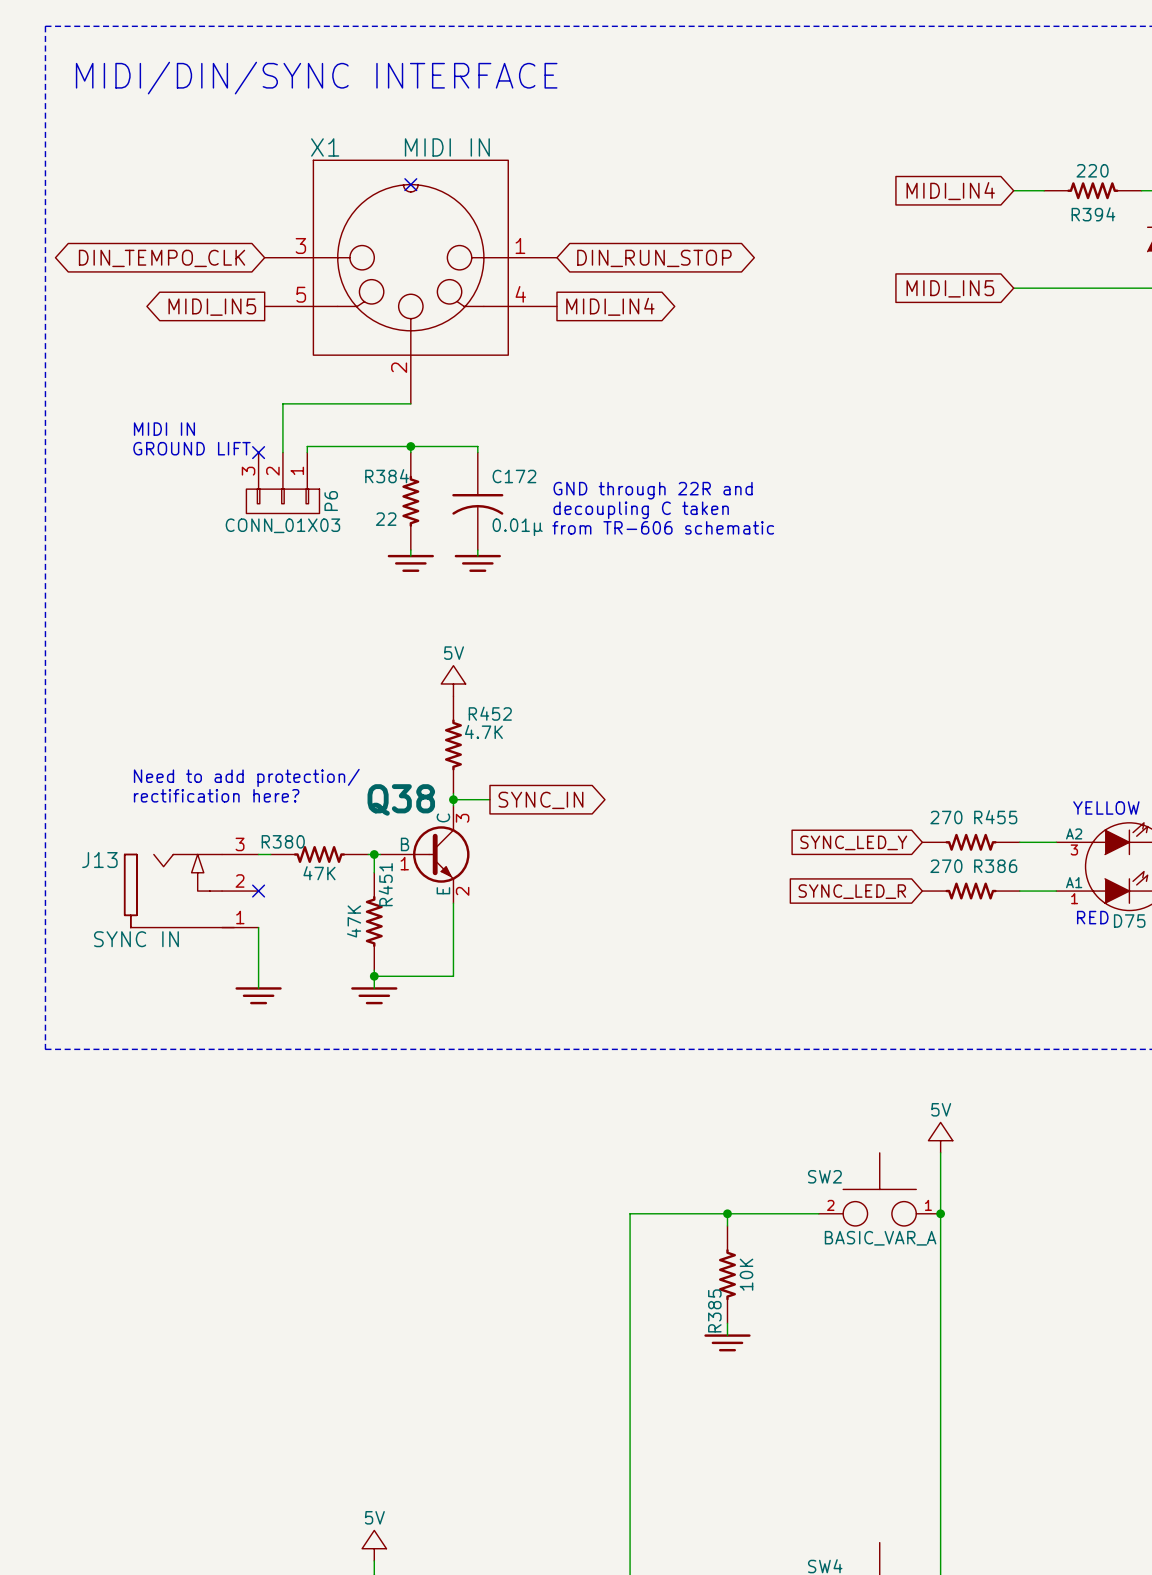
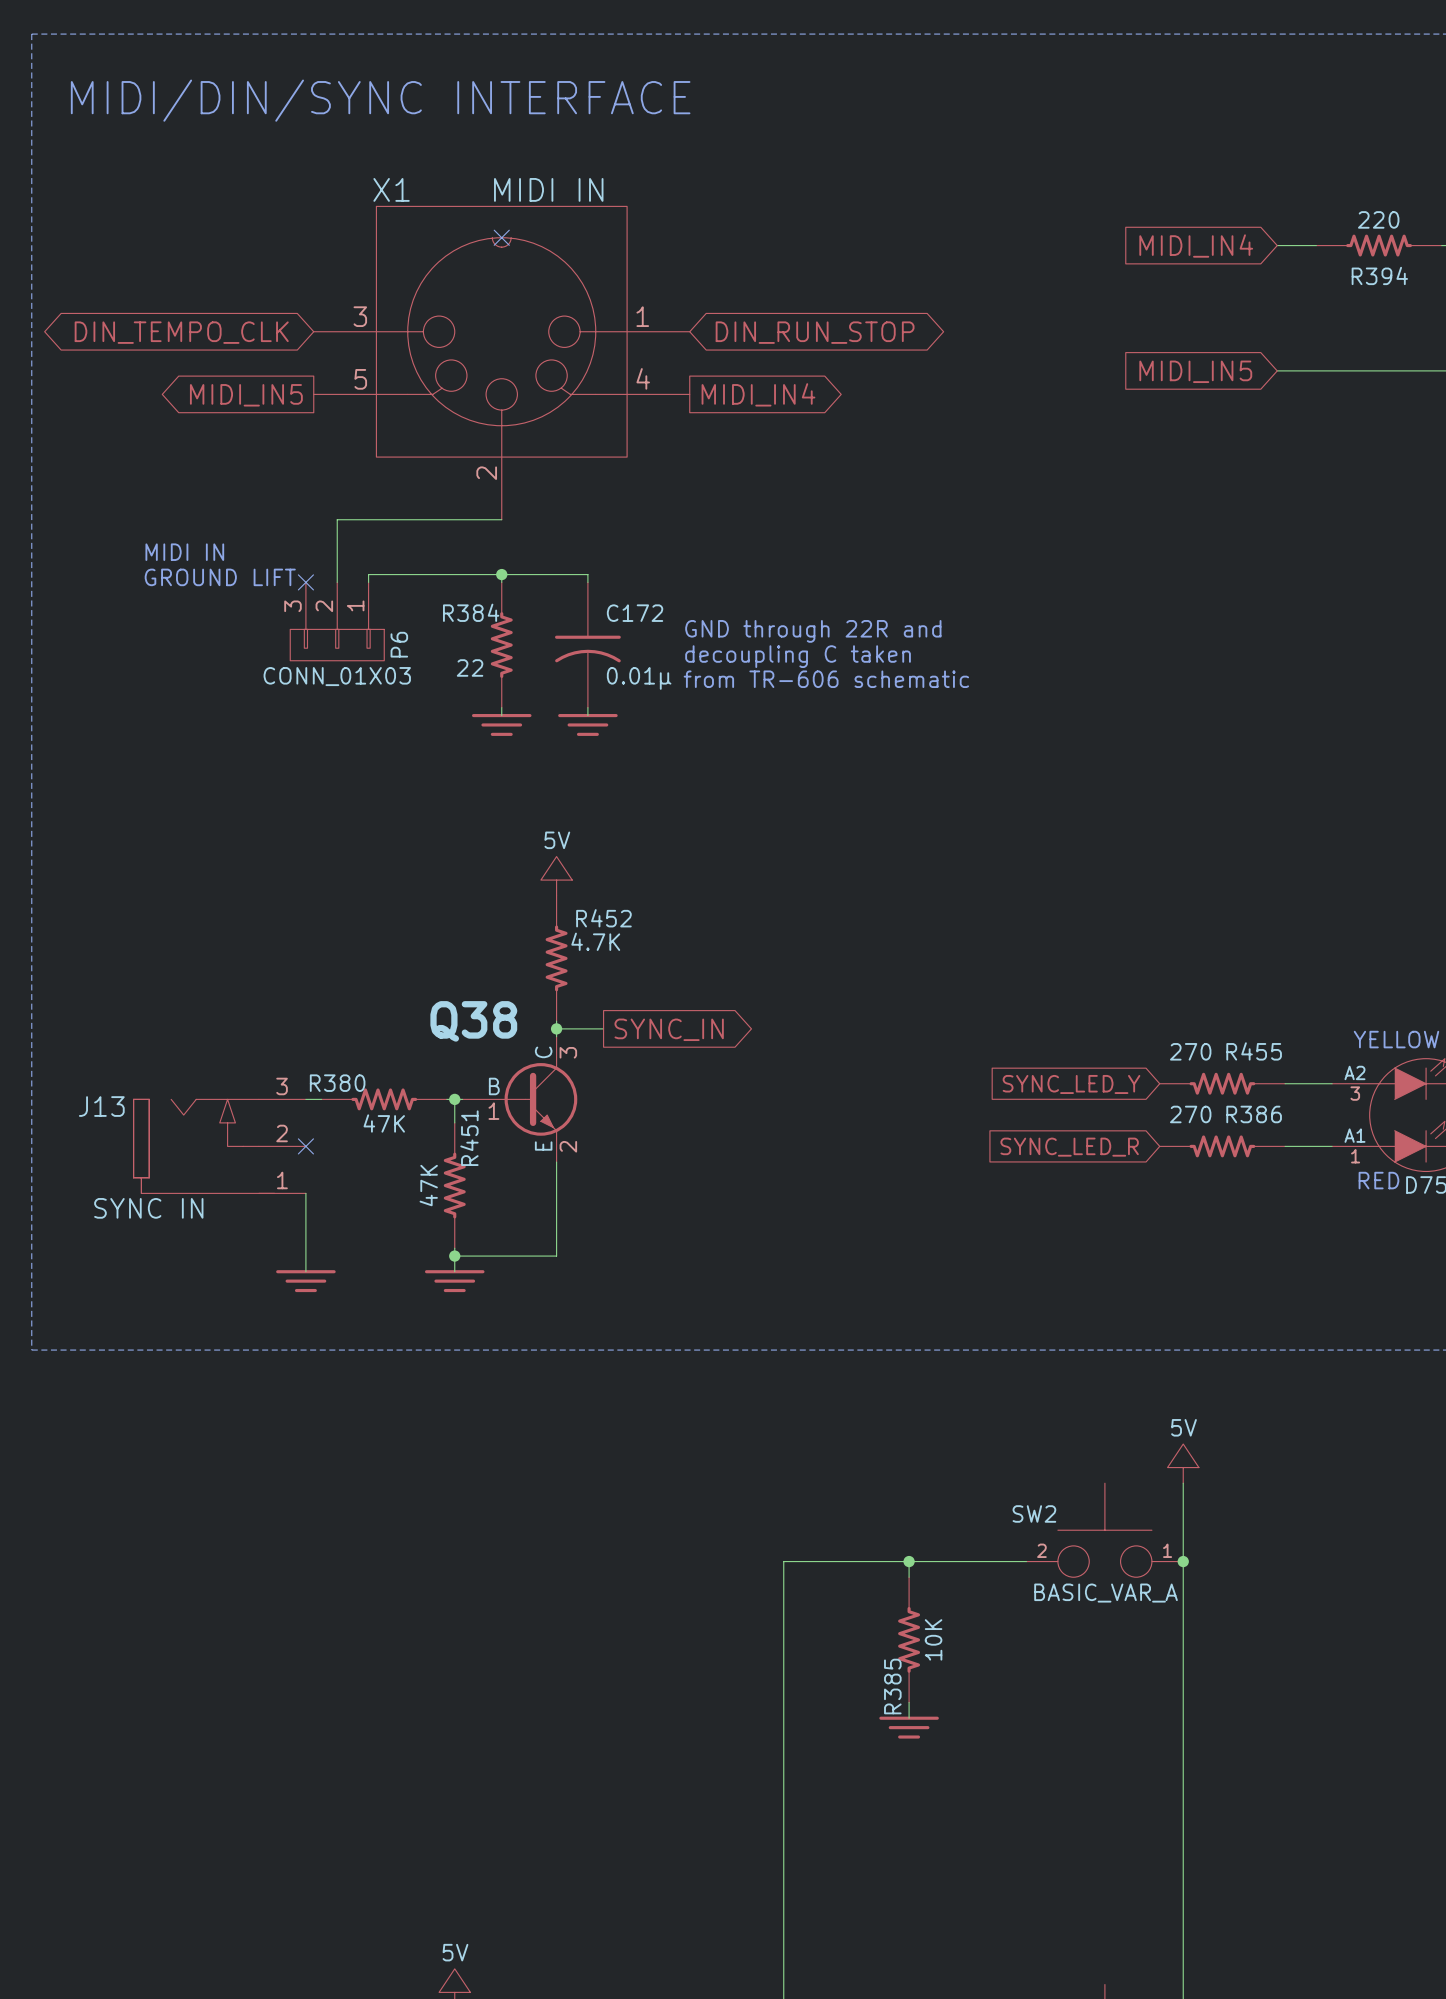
text: Need to add protection/ (246, 777) -> none
text: rectification here? (216, 795) -> none
Q38 name position: Q38 (401, 799) -> Q38 (473, 1021)

